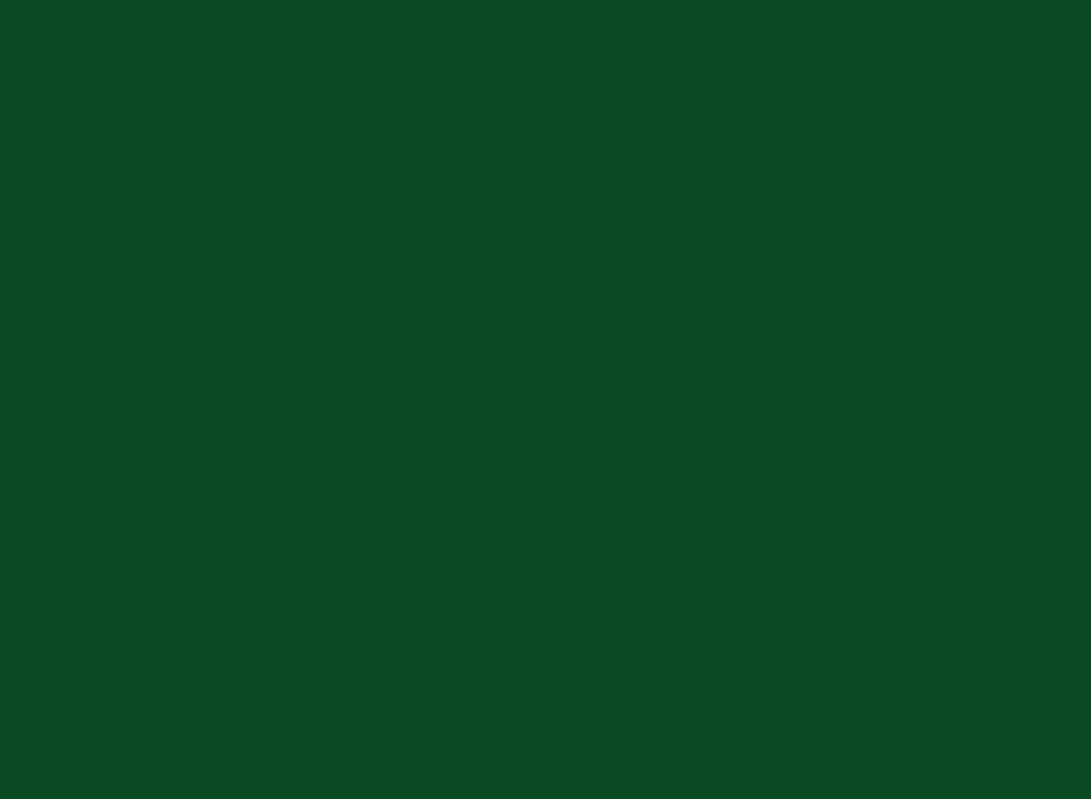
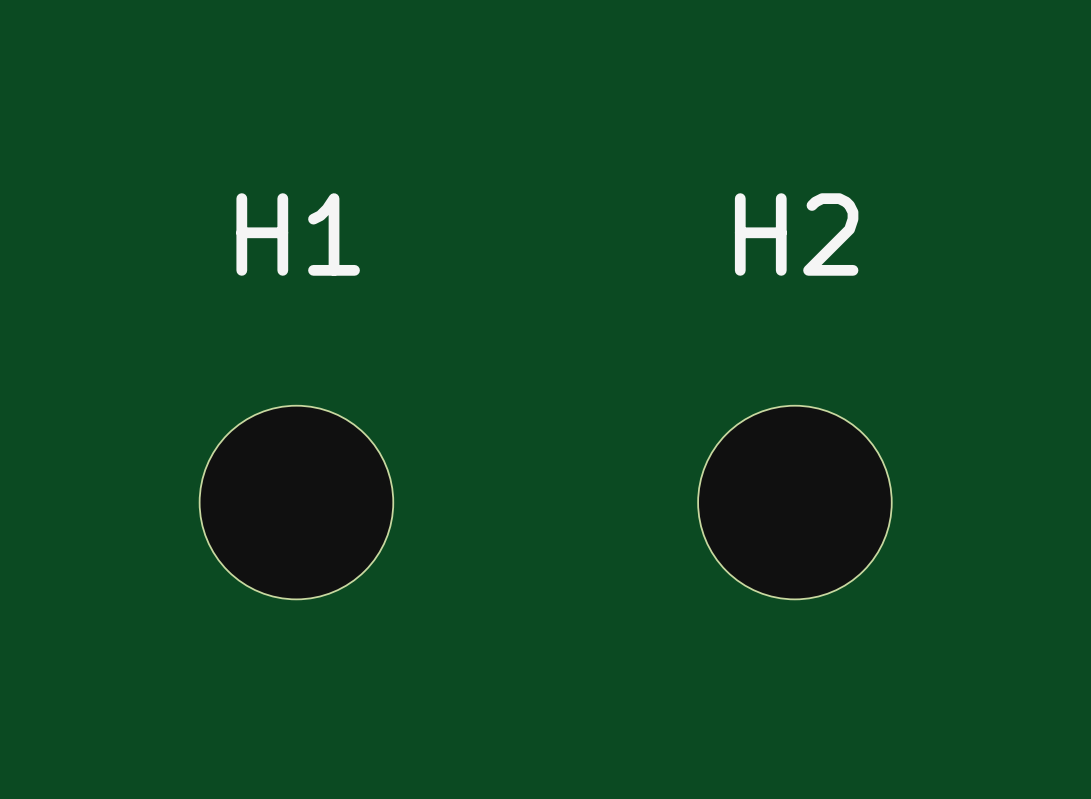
H1: none -> (296, 502)
H2: none -> (794, 502)

